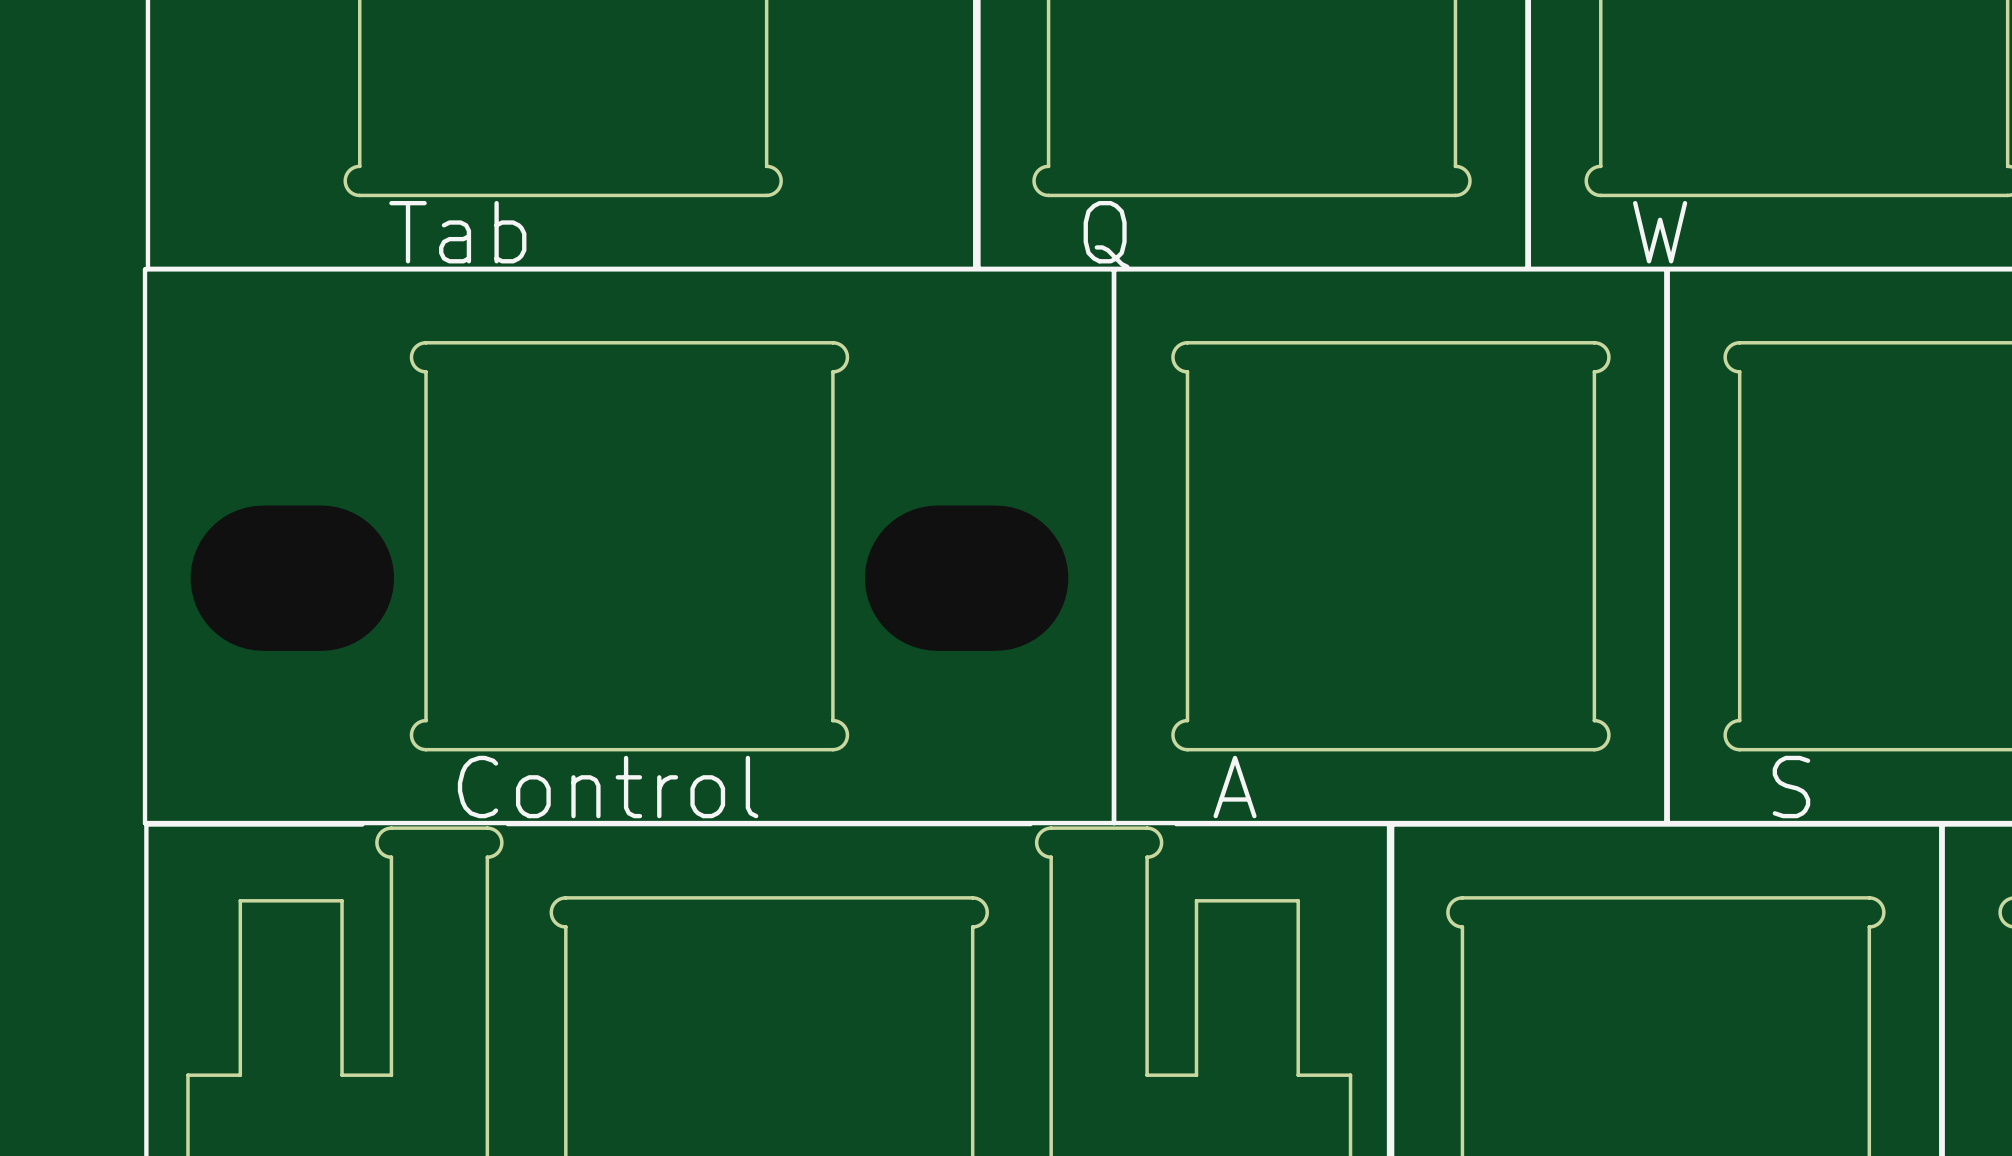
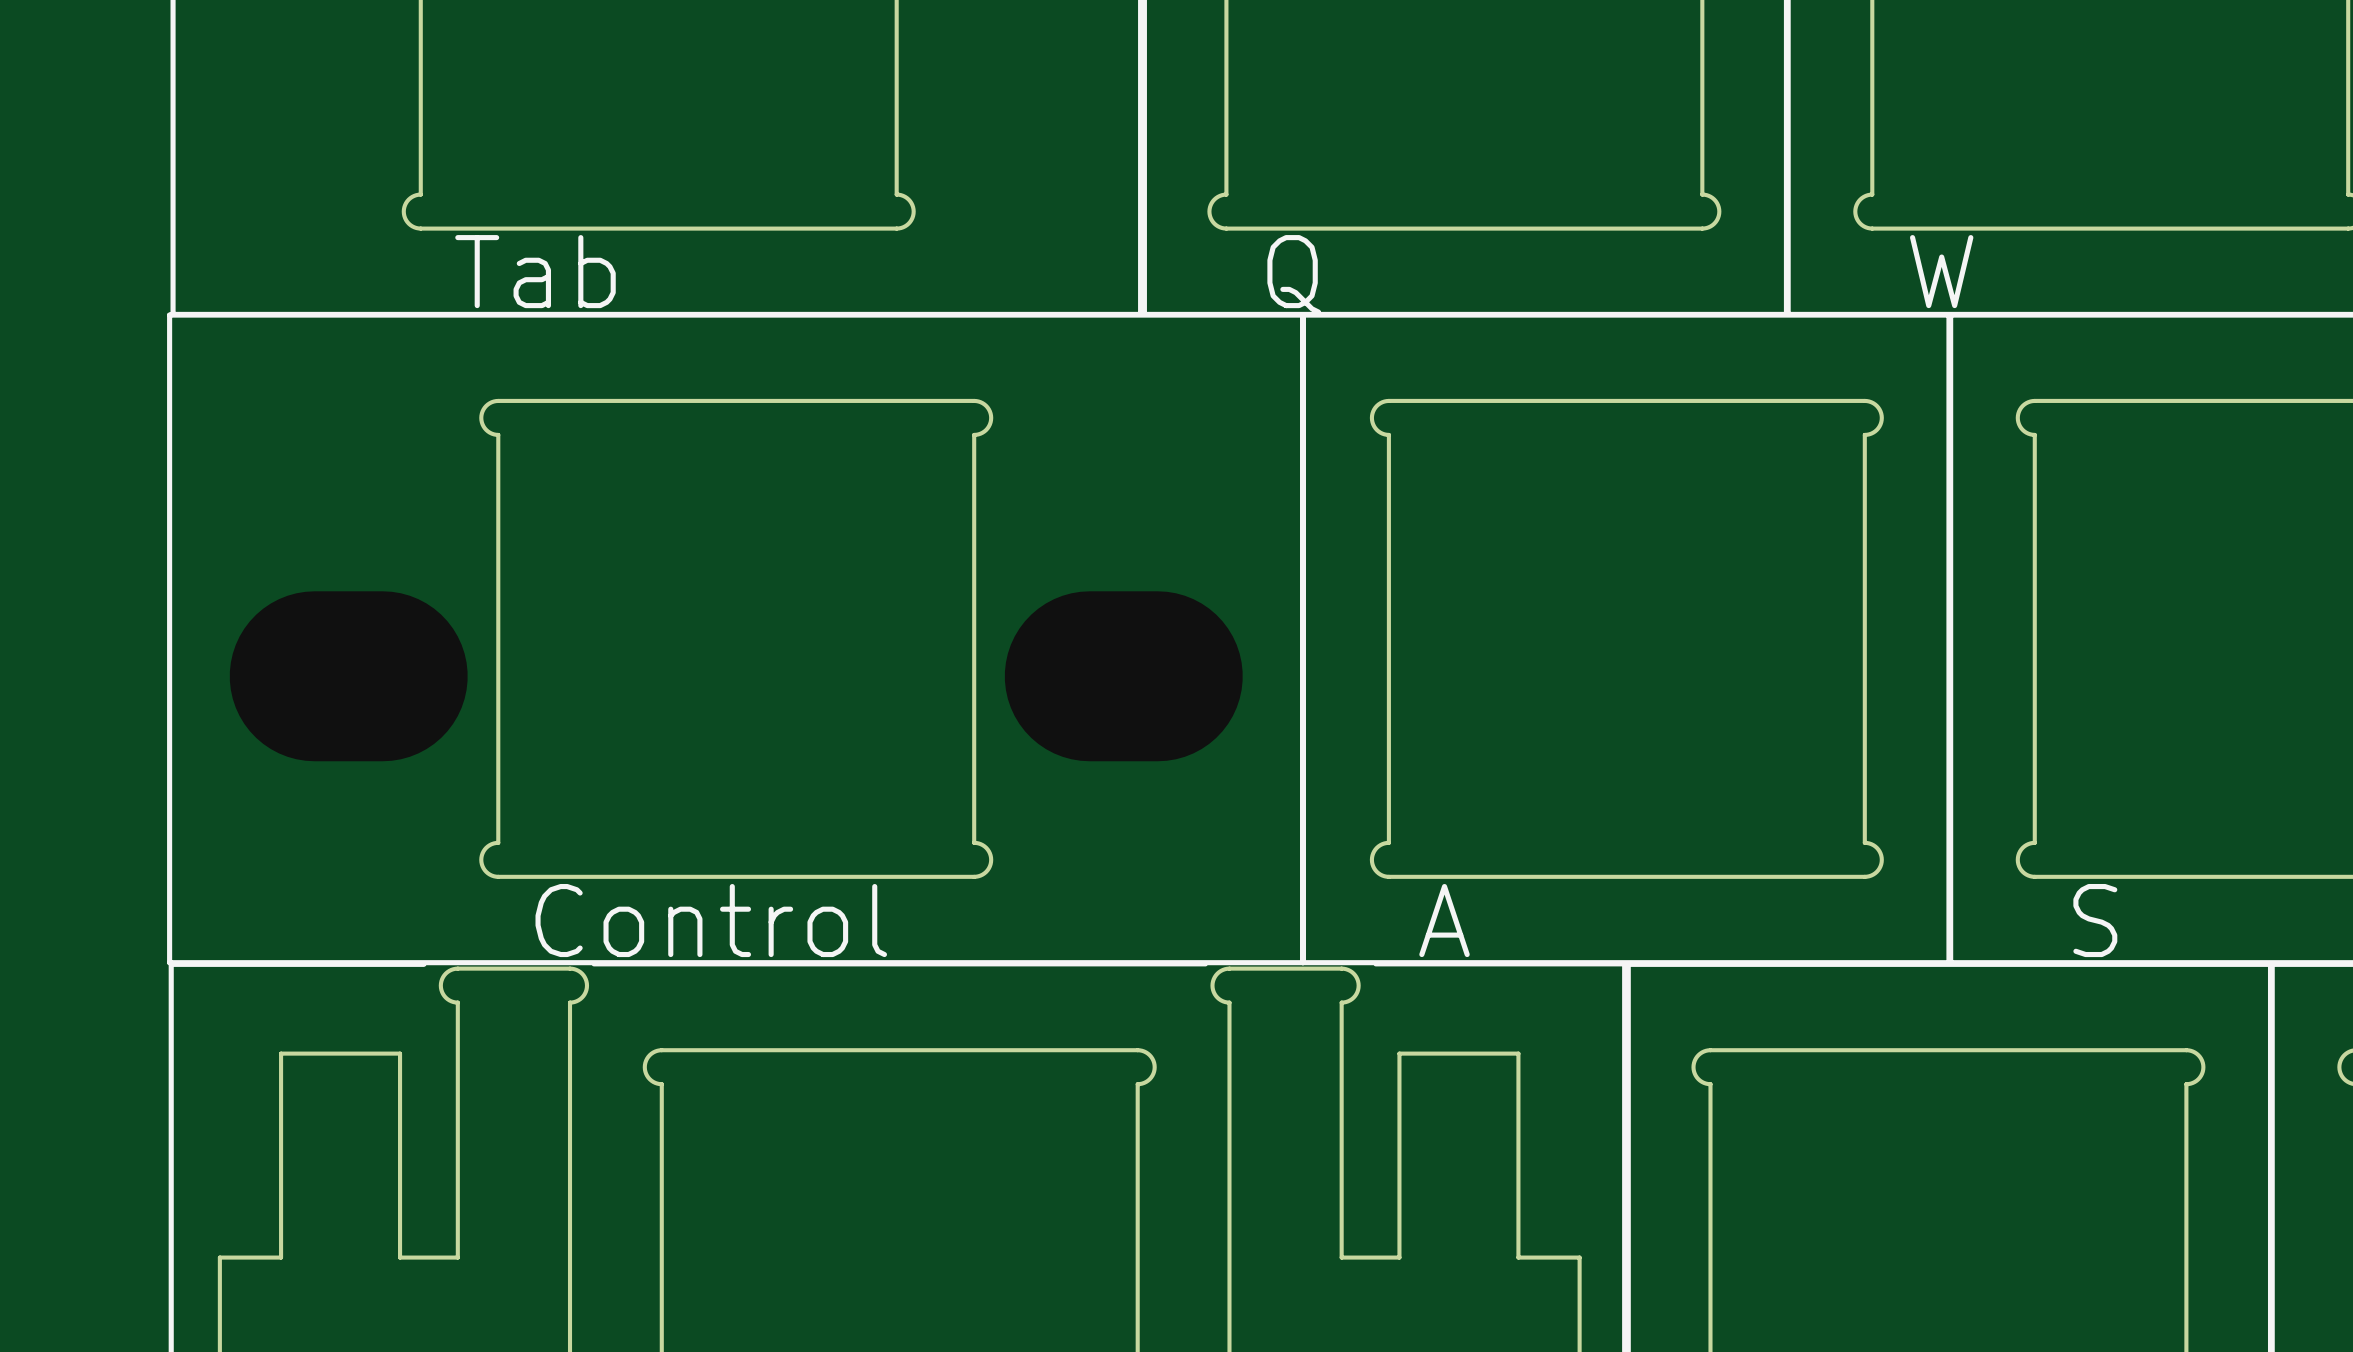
part footprint: [142, 267, 1117, 826] -> [167, 312, 1306, 966]

